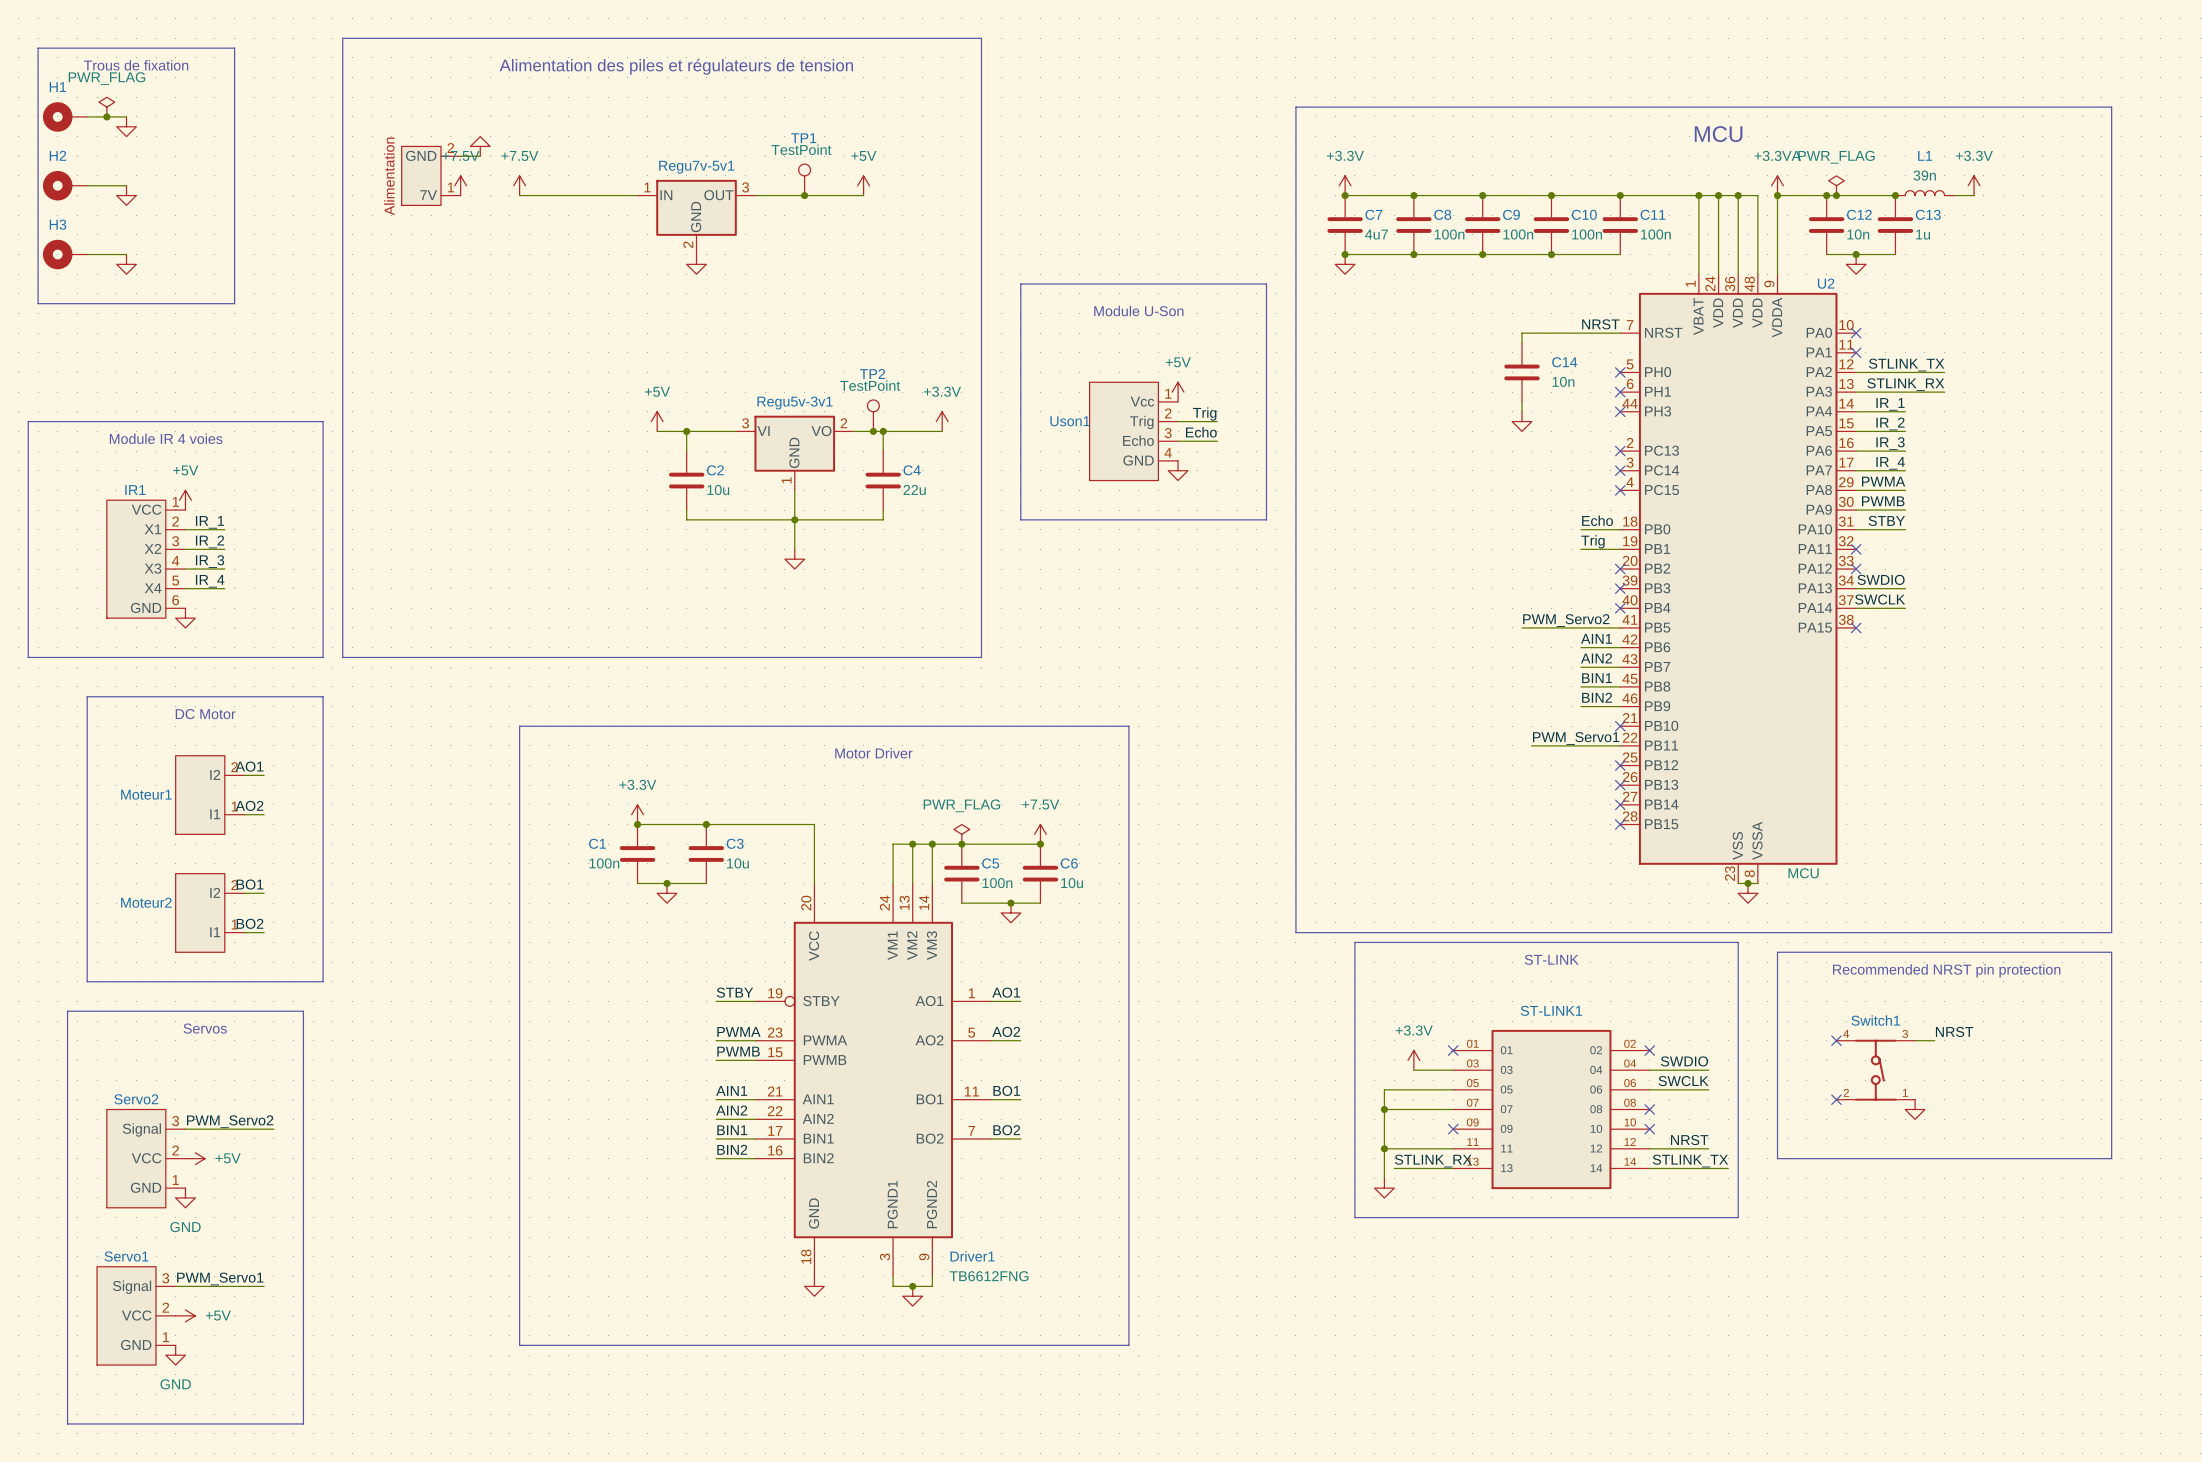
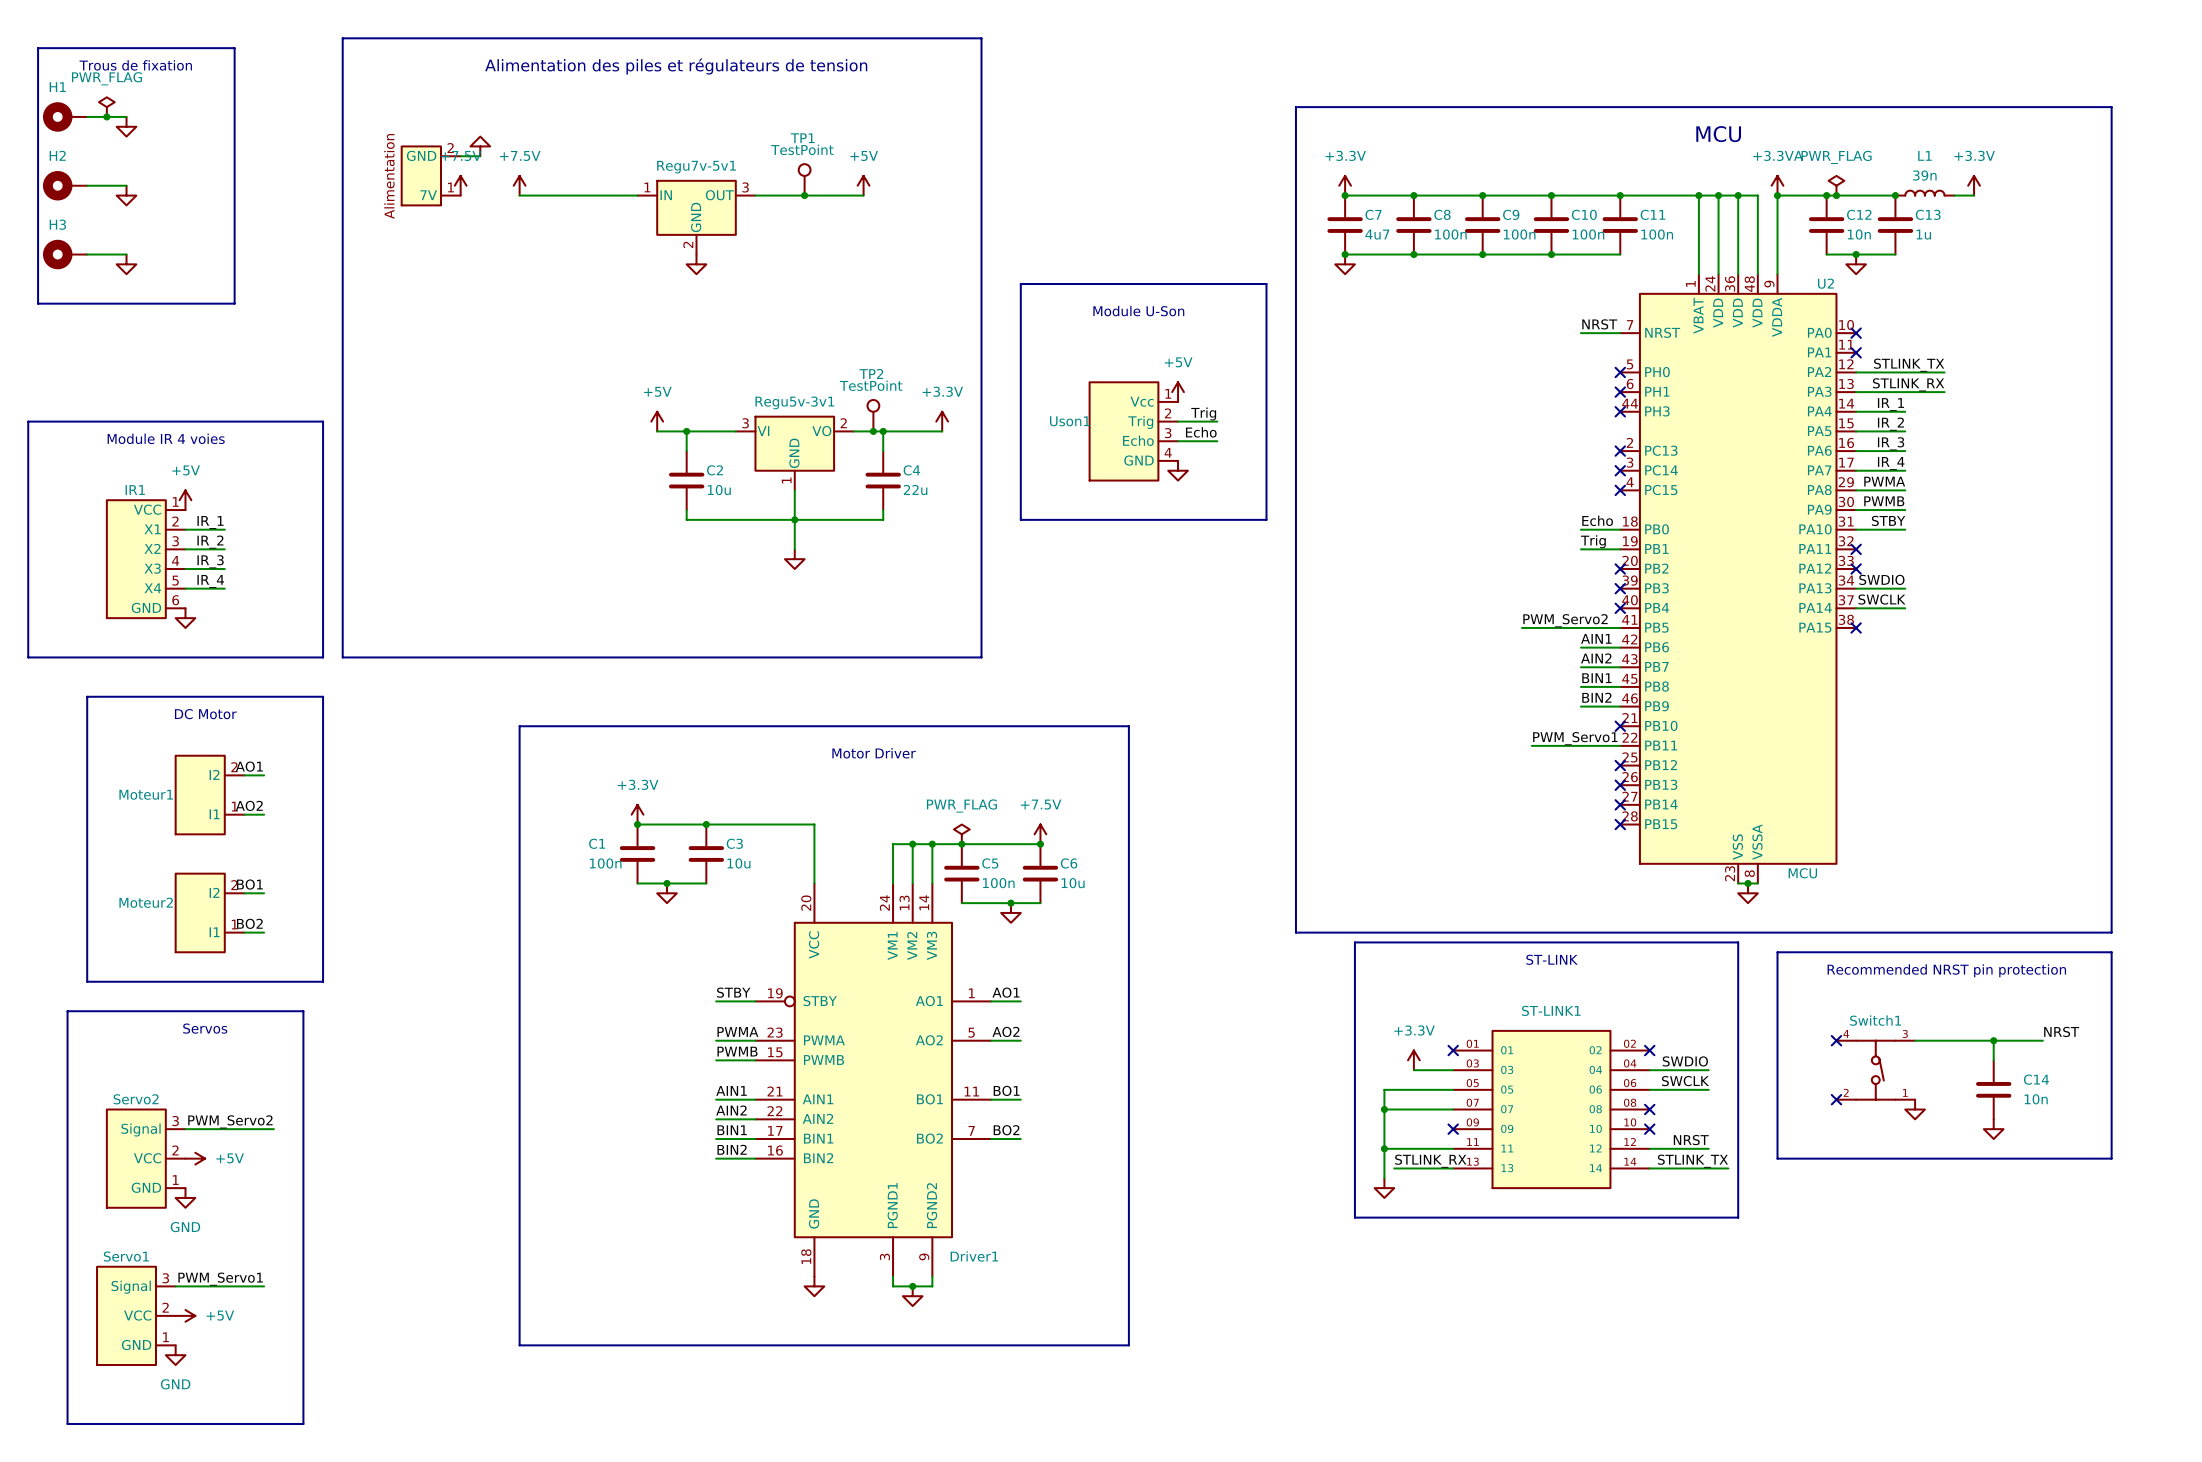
wire: (1580, 333) (1522, 333) (1522, 342) -> none
C14 position: (1522, 372) -> (1993, 1089)
wire: (1522, 401) (1522, 411) -> none
power symbol: (1522, 421) -> none
label position: NRST (1954, 1031) -> NRST (2061, 1031)
wire: none -> (1934, 1040) (2042, 1040)
wire: none -> (1993, 1040) (1993, 1060)
junction: none -> (1993, 1040)
power symbol: none -> (1993, 1129)
Driver1 value: TB6612FNG (989, 1276) -> none

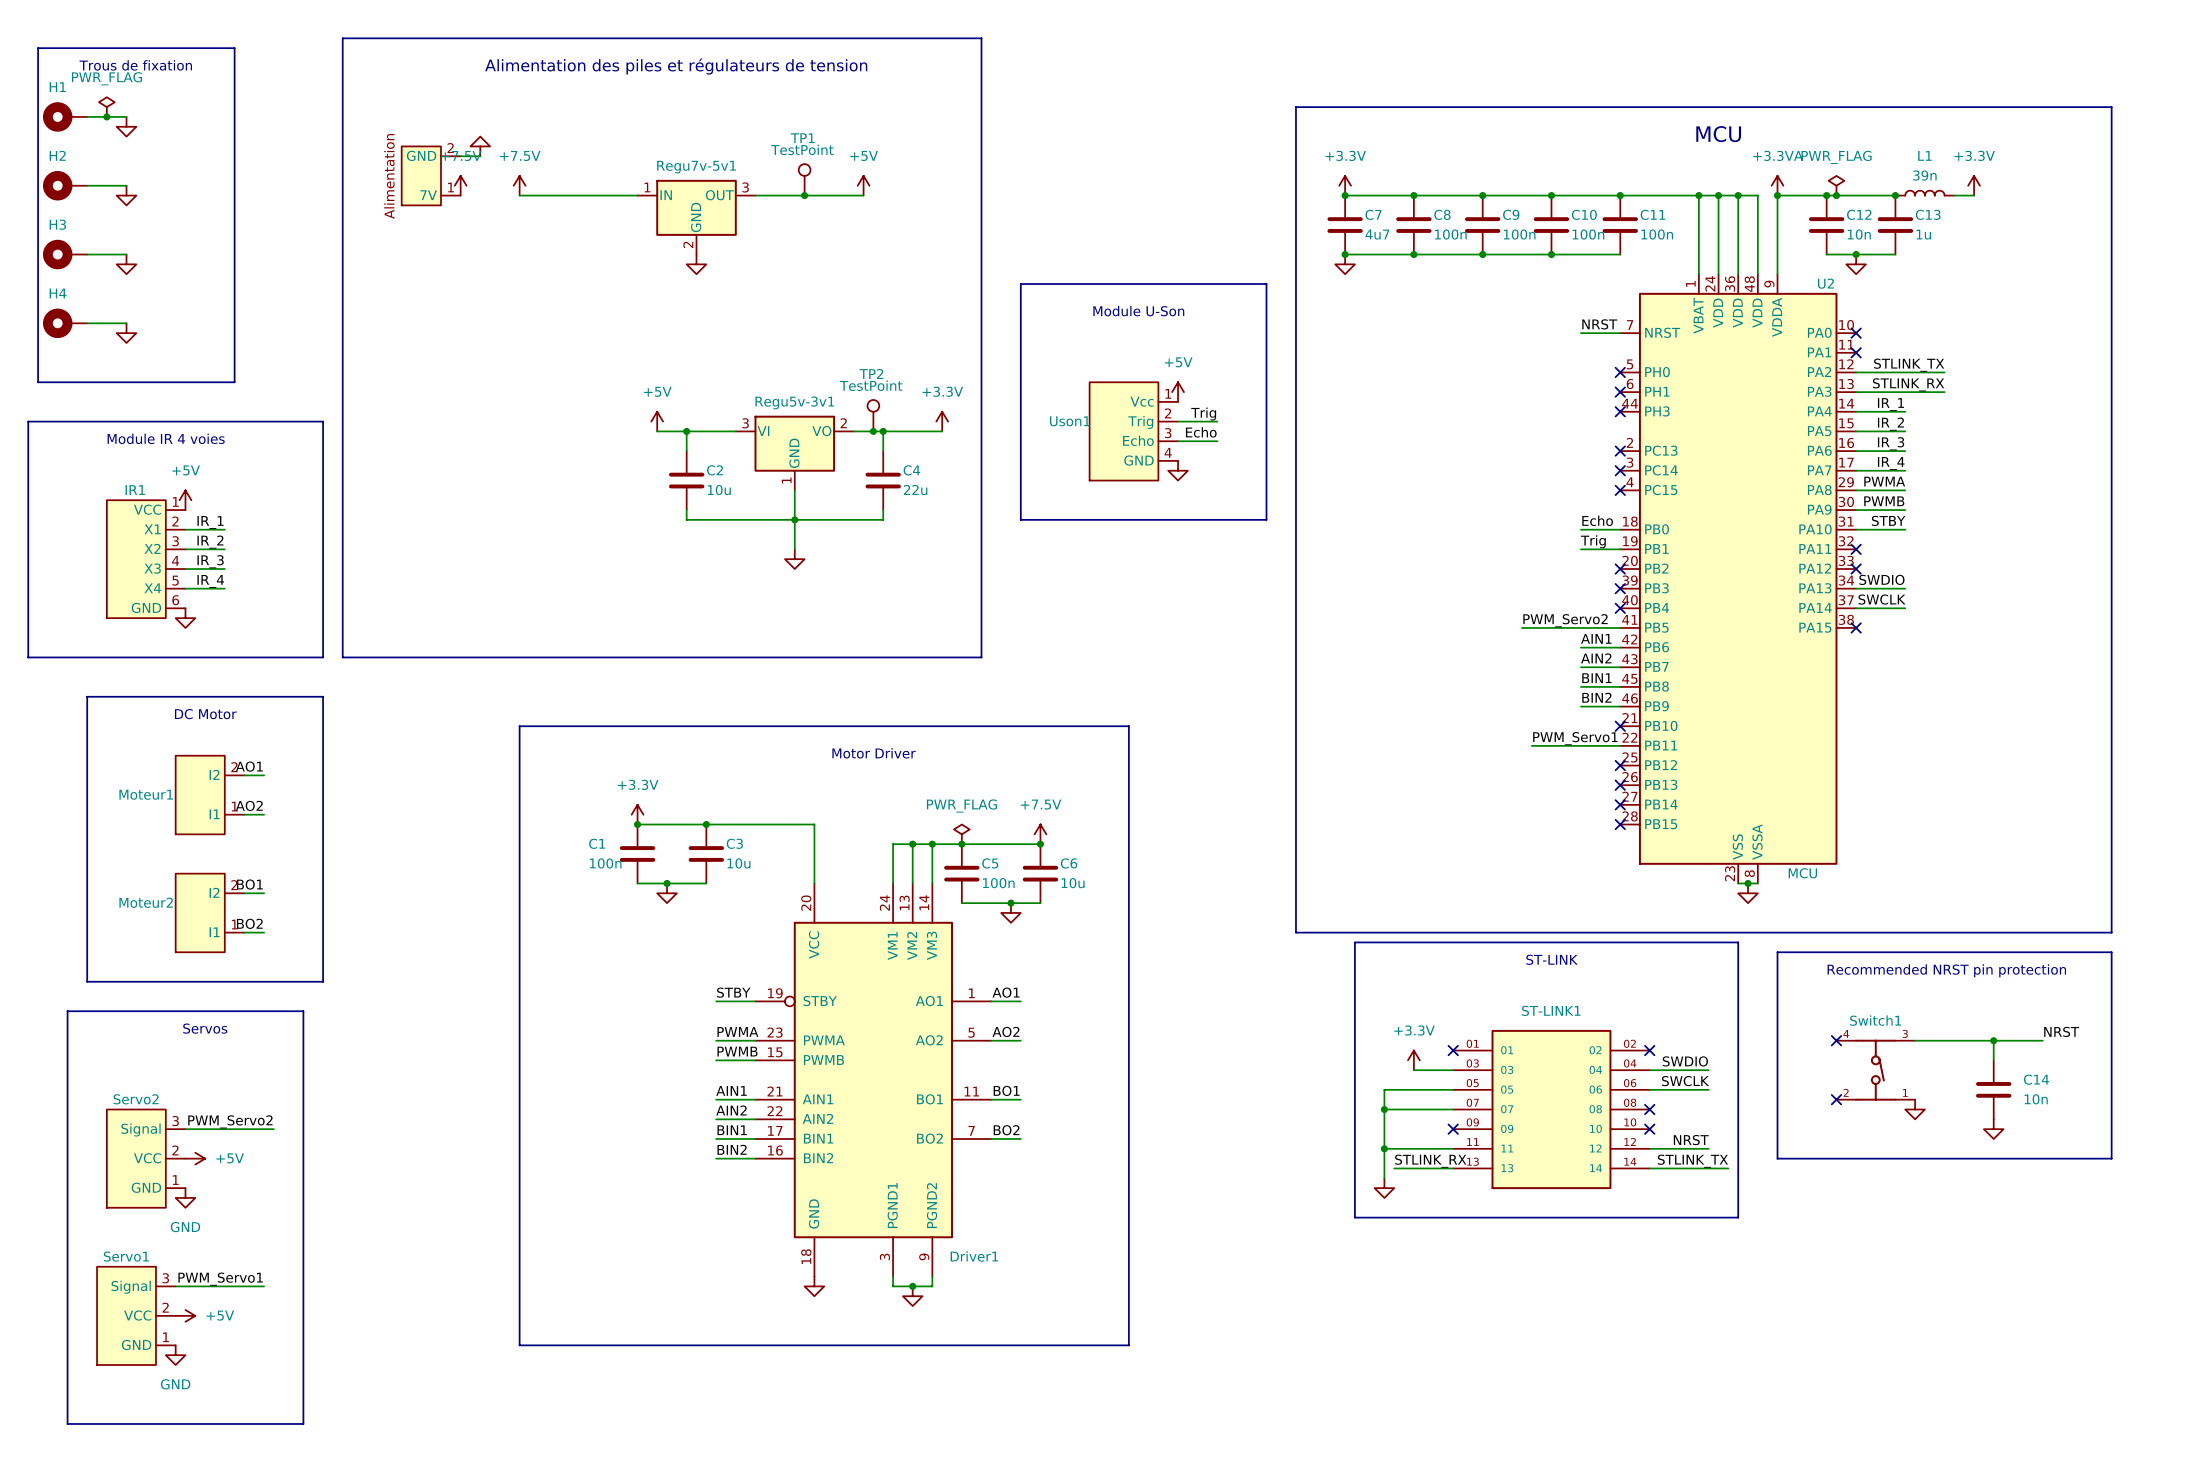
line: (38, 303) (234, 303) -> (38, 303) (38, 382) (234, 382) (234, 303)
H4: none -> (65, 323)
wire: none -> (87, 323) (126, 323)
power symbol: none -> (126, 333)

